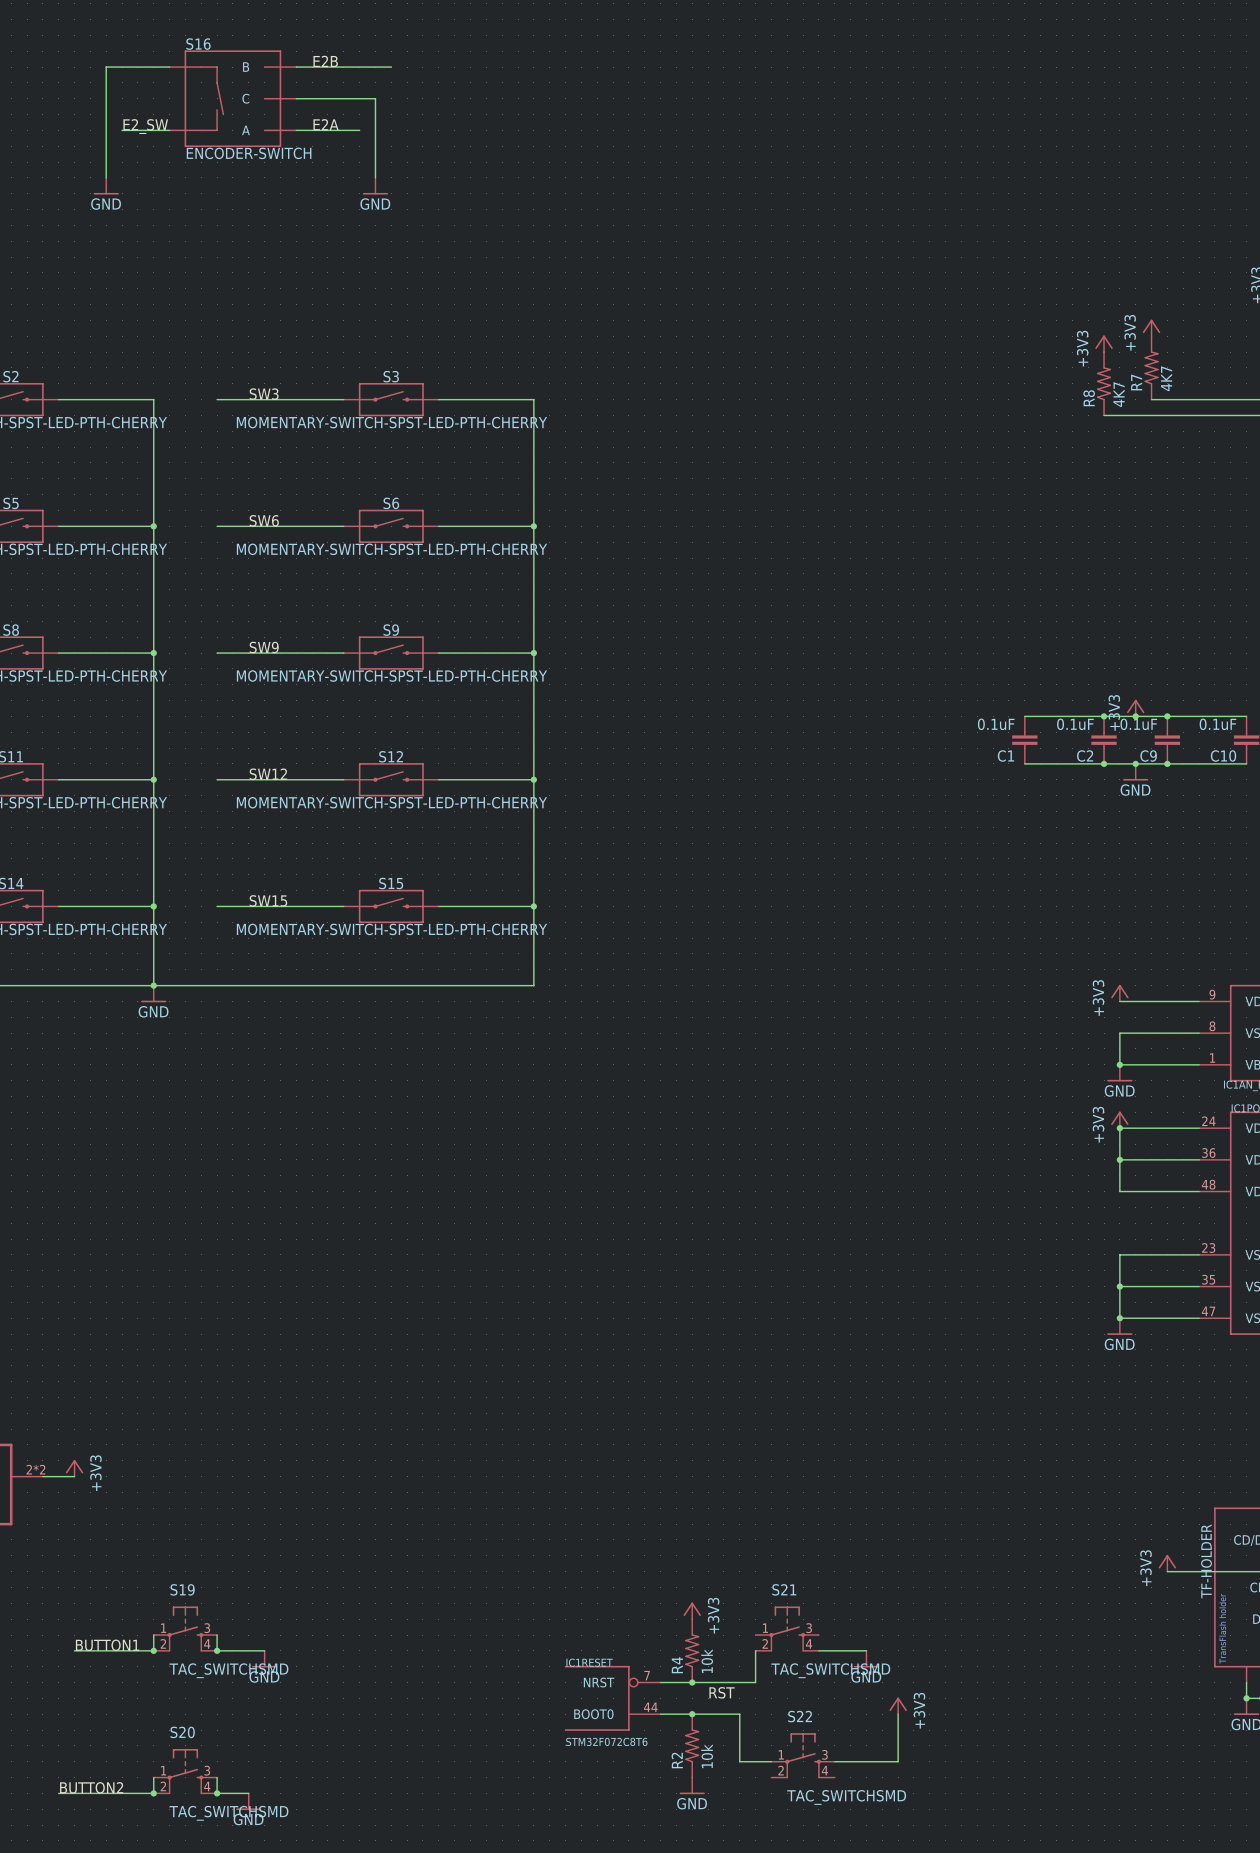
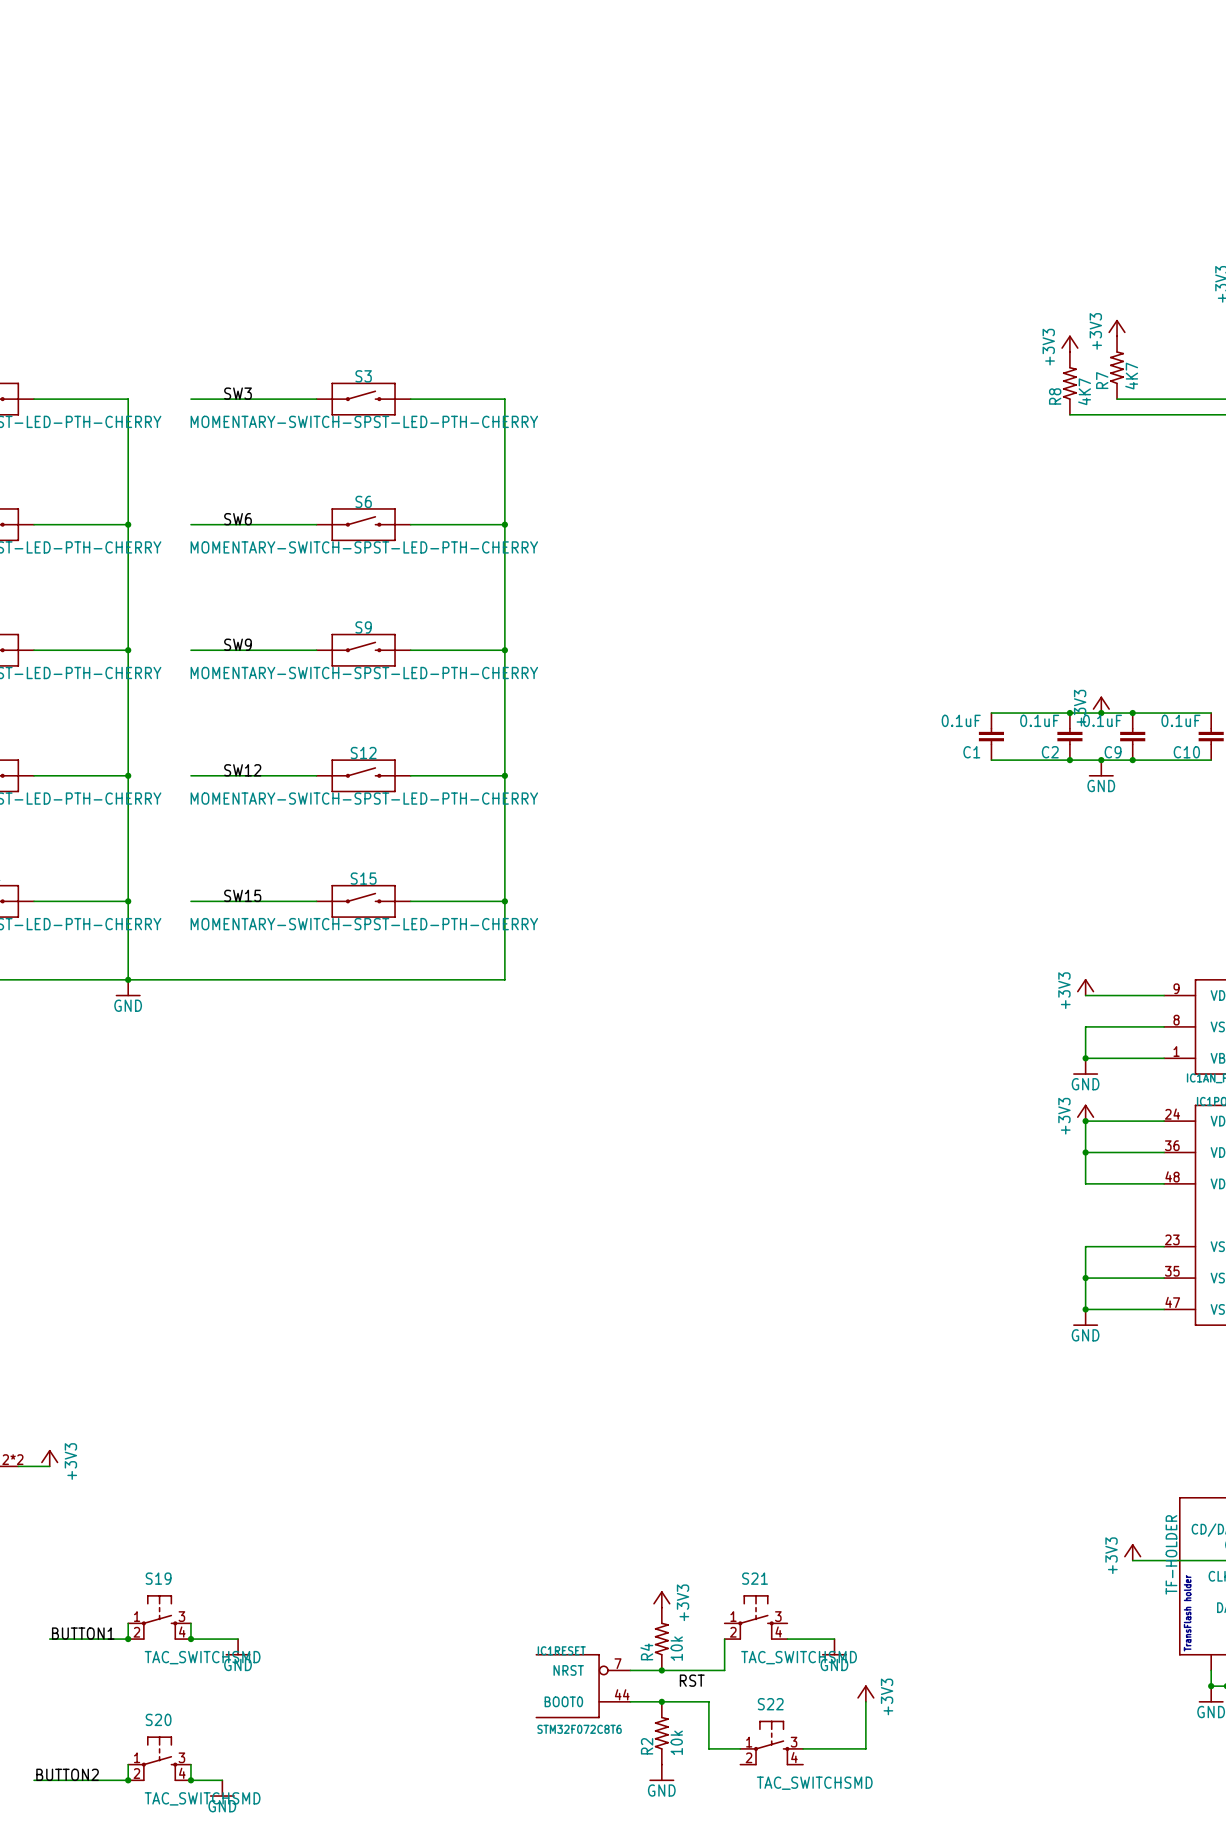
label: E2B (325, 61) -> none
wire: (169, 67) (106, 67) (106, 177) -> none
wire: (296, 67) (391, 67) -> none
S16: ENCODER-SWITCH (232, 98) -> none
wire: (296, 98) (375, 98) (375, 177) -> none
label: E2A (326, 124) -> none
label: E2_SW (145, 126) -> none
wire: (122, 130) (169, 130) -> none
wire: (296, 130) (359, 130) -> none
power symbol: GND (106, 186) -> none
power symbol: GND (375, 186) -> none

